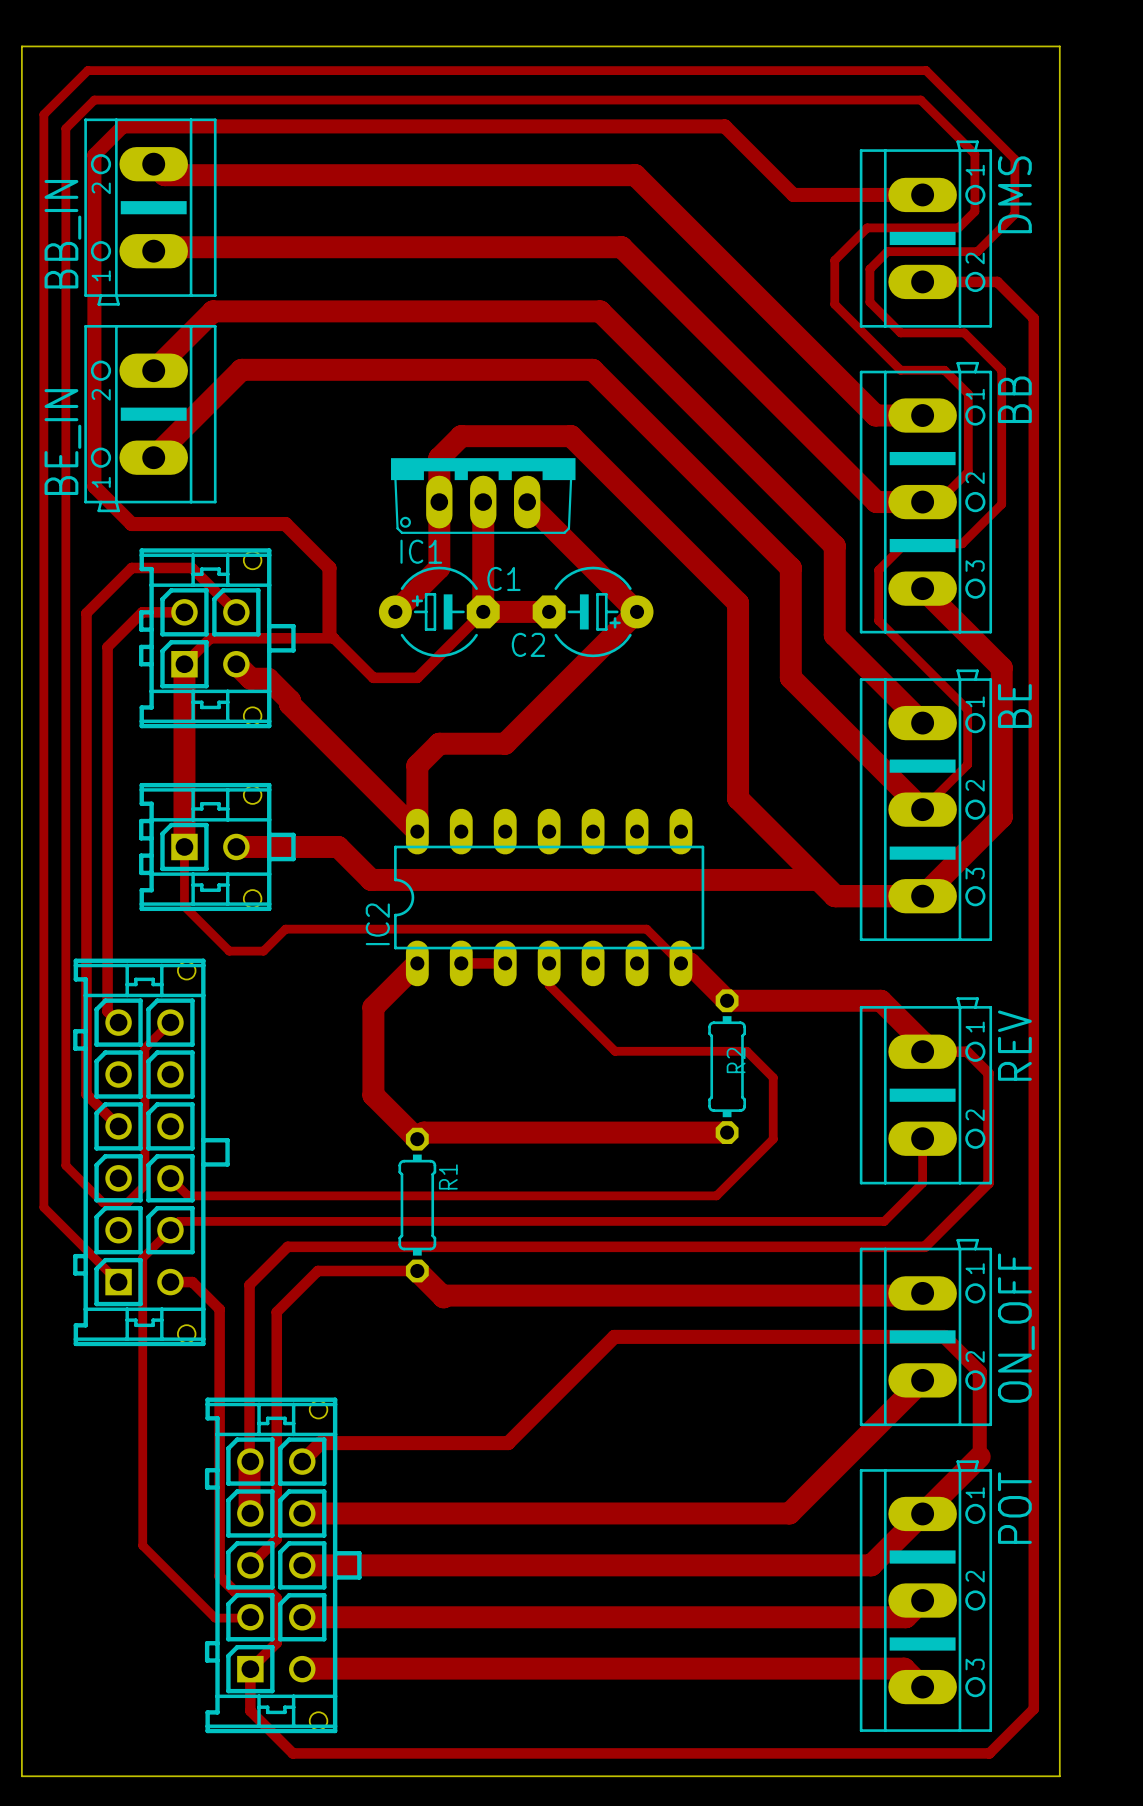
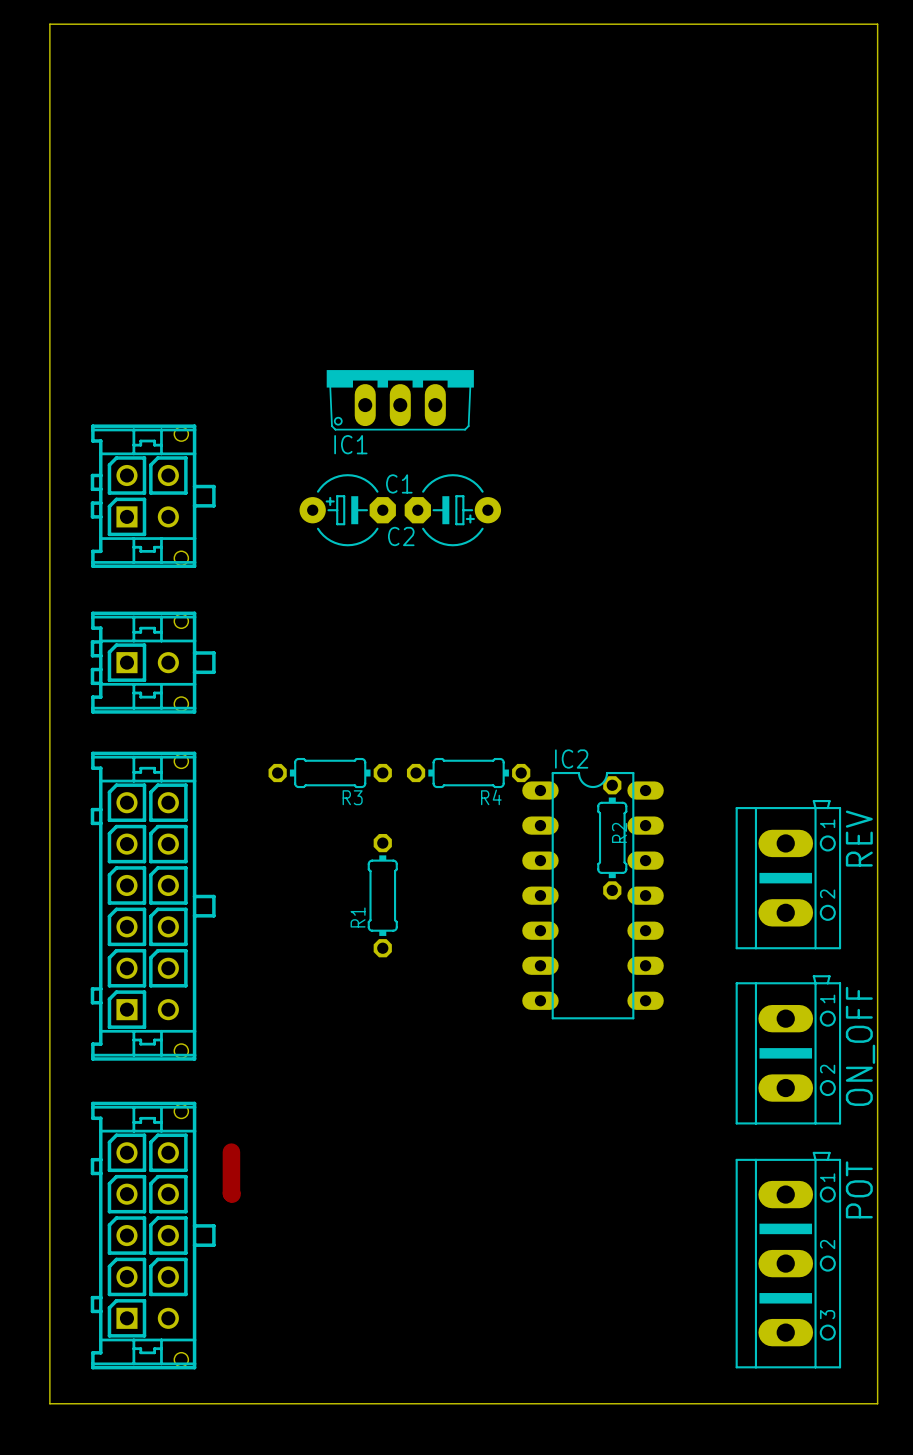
track: (153, 164) (164, 175) (635, 175) (875, 415) (922, 415) -> none
track: (922, 194) (793, 194) (724, 126) (122, 126) (94, 154) (94, 486) (131, 524) (285, 524) (329, 567) (329, 633) (373, 677) (417, 677) (483, 611) -> none
BB_IN: (150, 212) -> none
DMS: (925, 234) -> none
track: (153, 251) (157, 247) (621, 247) (876, 502) (938, 502) (968, 471) (968, 393) (944, 370) (900, 370) (834, 304) (834, 260) (867, 227) (958, 227) (974, 211) (974, 154) (920, 100) (94, 100) (65, 128) (65, 1165) (103, 1202) (127, 1202) (144, 1185) (144, 1048) (170, 1022) -> none
track: (922, 281) (997, 281) (1033, 318) (1033, 1709) (989, 1753) (292, 1753) (250, 1710) (250, 1669) (276, 1642) (276, 1598) (270, 1591) (235, 1591) (219, 1576) (219, 1309) (192, 1282) (170, 1282) -> none
track: (153, 370) (213, 311) (600, 311) (834, 546) (834, 635) (922, 723) -> none
BE_IN: (150, 418) -> none
track: (153, 457) (241, 369) (592, 369) (790, 567) (790, 677) (922, 809) (967, 764) (967, 709) (878, 620) (878, 570) (905, 543) (962, 543) (1001, 504) (1001, 370) (964, 332) (900, 332) (869, 302) (869, 269) (887, 251) (977, 251) (1014, 214) (1014, 159) (926, 70) (87, 70) (43, 114) (43, 1207) (118, 1282) -> none
IC1 position: (483, 496) -> (400, 400)
BB: (925, 497) -> none
track: (483, 502) (483, 611) -> none
track: (527, 502) (637, 611) (505, 743) (439, 743) (417, 765) (417, 831) (290, 704) (290, 700) (268, 678) (250, 678) (236, 664) -> none
track: (922, 588) (1001, 667) (1001, 817) (922, 896) (834, 896) (818, 879) (371, 879) (338, 846) (236, 846) -> none
track: (395, 611) (439, 567) (439, 458) (461, 436) (571, 436) (738, 603) (738, 798) (835, 896) -> none
C1 position: (439, 611) -> (347, 510)
track: (483, 611) (549, 611) -> none
C2 position: (593, 611) -> (452, 510)
track: (184, 612) (142, 612) (107, 647) (107, 1011) (118, 1022) -> none
track: (236, 612) (192, 567) (131, 567) (86, 613) (86, 1094) (118, 1126) -> none
part position: (217, 638) -> (153, 496)
track: (333, 638) (210, 638) (184, 664) (184, 906) (229, 951) (263, 951) (285, 929) (646, 929) (680, 963) (689, 963) (727, 1000) (880, 1000) (922, 1042) (922, 1051) (967, 1051) (988, 1073) (988, 1183) (924, 1246) (287, 1246) (249, 1285) (250, 1461) -> none
BE: (925, 805) -> none
part position: (217, 846) -> (153, 662)
IC2 rotation: 0° (549, 897) -> 90° clockwise (593, 895)
IC2 position: (549, 897) -> (593, 895)
track: (417, 963) (373, 1007) (373, 1095) (417, 1139) (423, 1132) (727, 1132) -> none
track: (461, 963) (505, 963) -> none
track: (549, 963) (549, 985) (615, 1051) (746, 1051) (773, 1077) (773, 1139) (716, 1195) (188, 1195) (170, 1178) -> none
R3: none -> (330, 773)
R4: none -> (468, 773)
REV position: (925, 1090) -> (788, 874)
track: (922, 1138) (922, 1183) (884, 1221) (179, 1221) (142, 1257) (142, 1545) (215, 1618) (250, 1617) -> none
R1 name position: R1 (448, 1176) -> R1 (358, 917)
R1 position: (417, 1205) -> (382, 895)
track: (922, 1293) (920, 1295) (443, 1295) (443, 1297) (417, 1270) (317, 1270) (276, 1312) (276, 1539) (250, 1565) -> none
ON_OFF position: (925, 1332) -> (788, 1049)
track: (922, 1380) (789, 1513) (302, 1513) -> none
track: (302, 1461) (320, 1443) (508, 1443) (614, 1336) (944, 1336) (979, 1372) (979, 1456) (871, 1565) (302, 1565) -> none
part position: (283, 1565) -> (153, 1235)
POT position: (925, 1596) -> (788, 1260)
track: (922, 1600) (905, 1617) (302, 1617) -> none
track: (302, 1669) (904, 1668) (922, 1687) -> none

